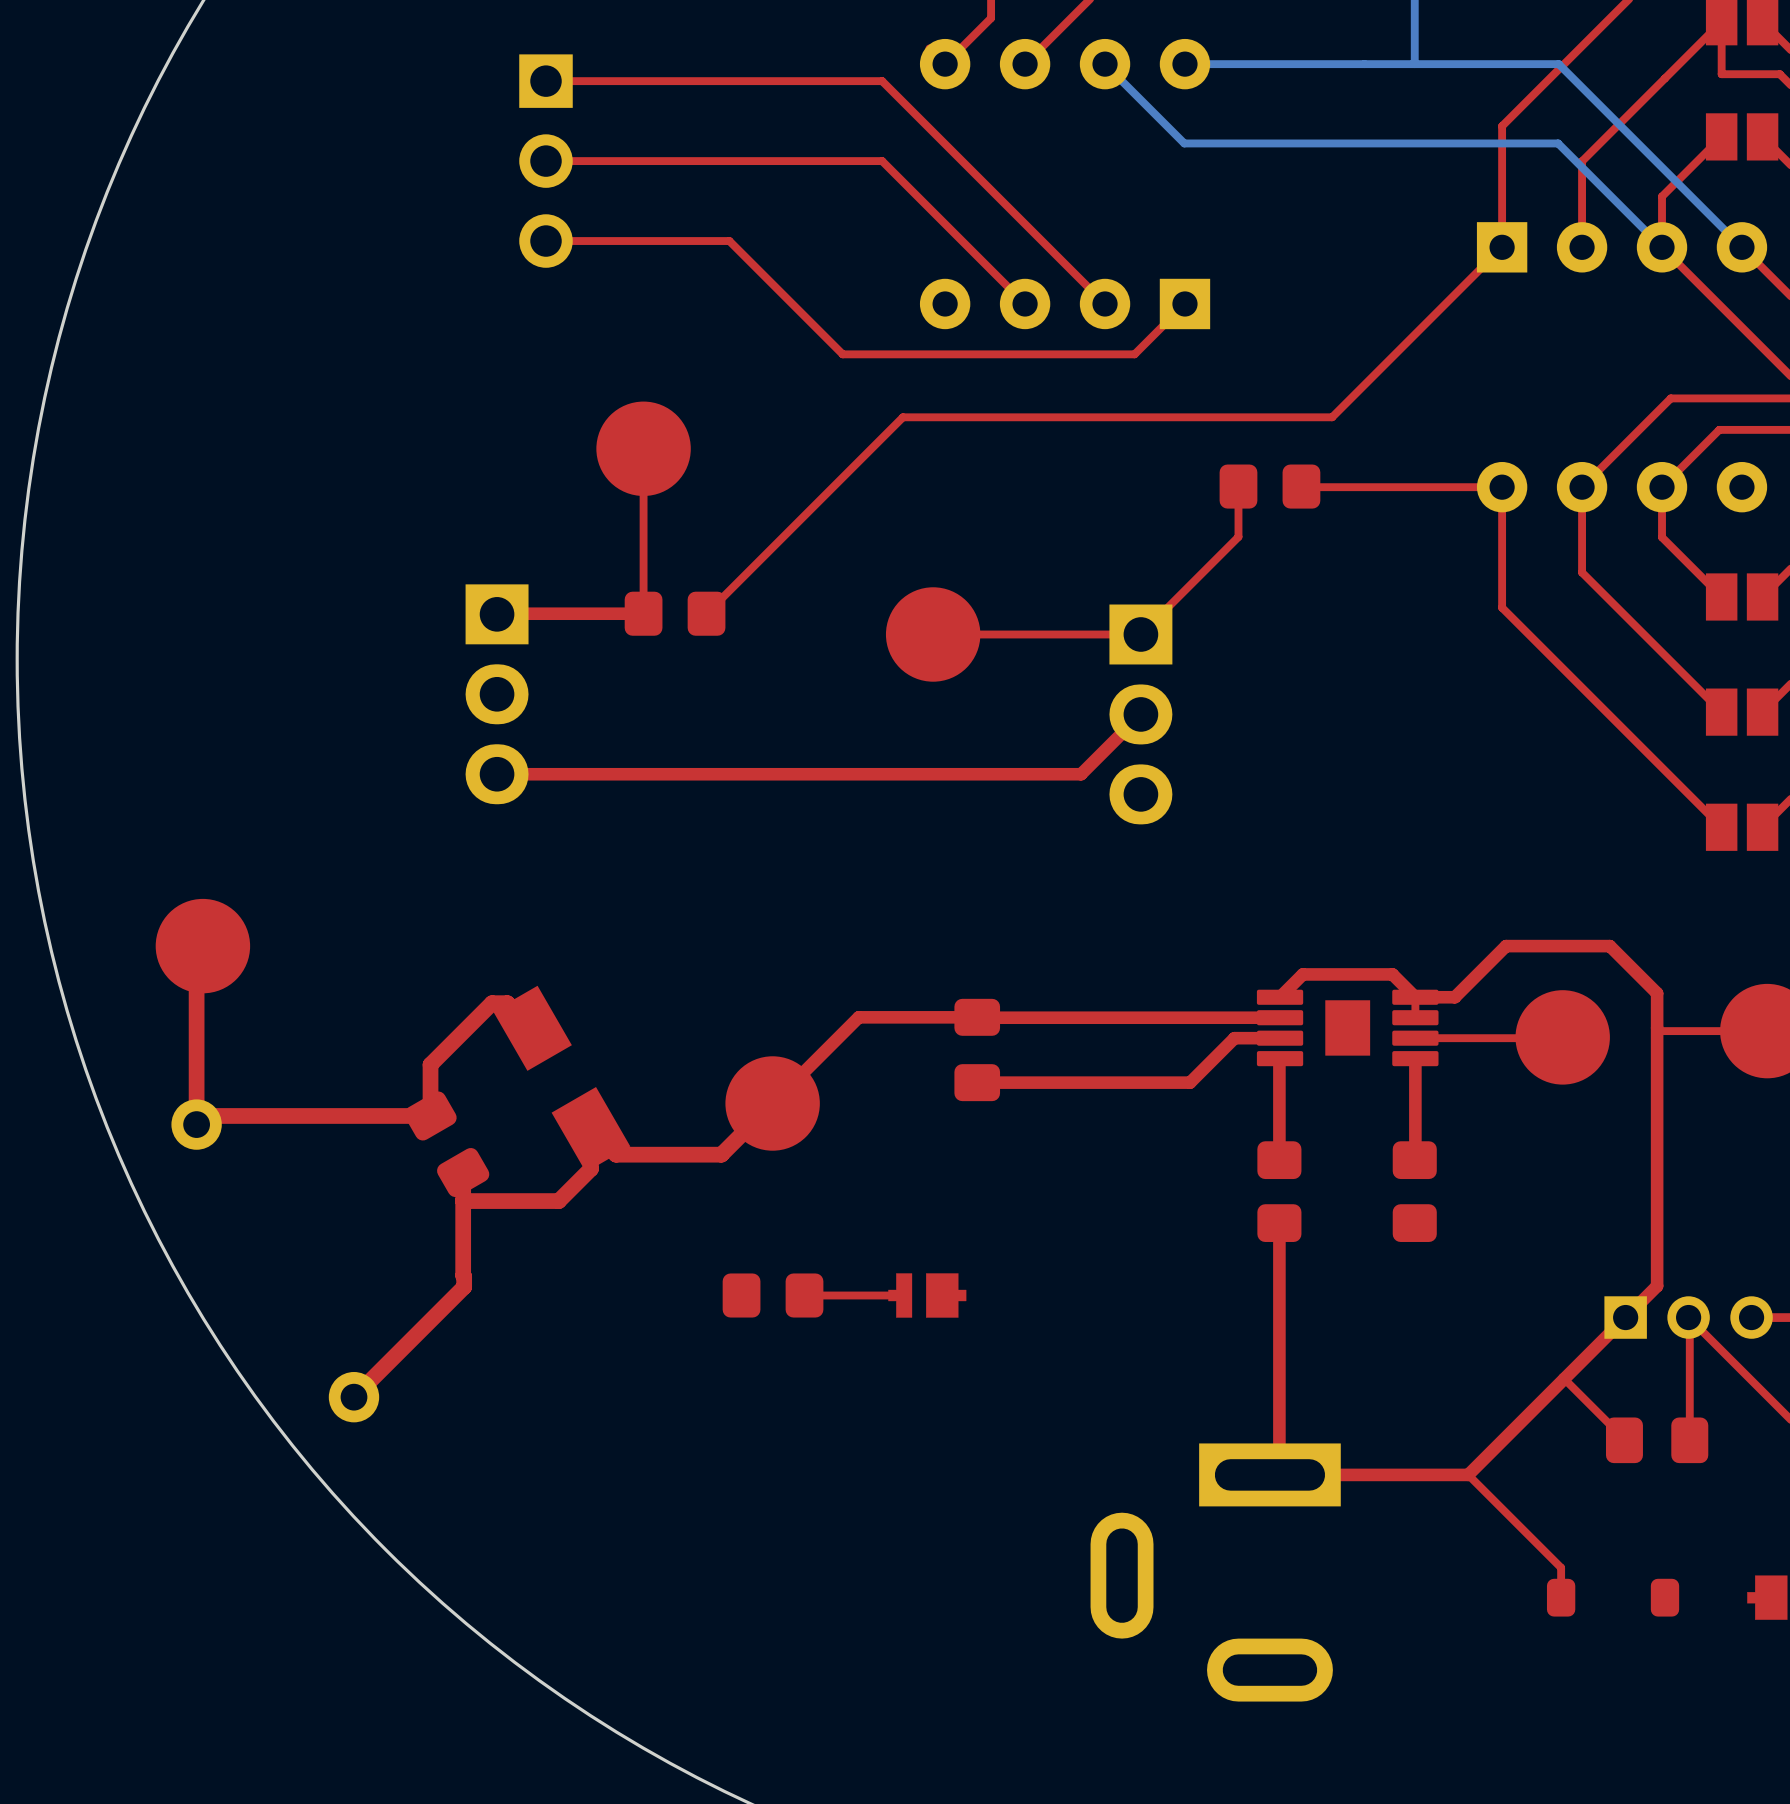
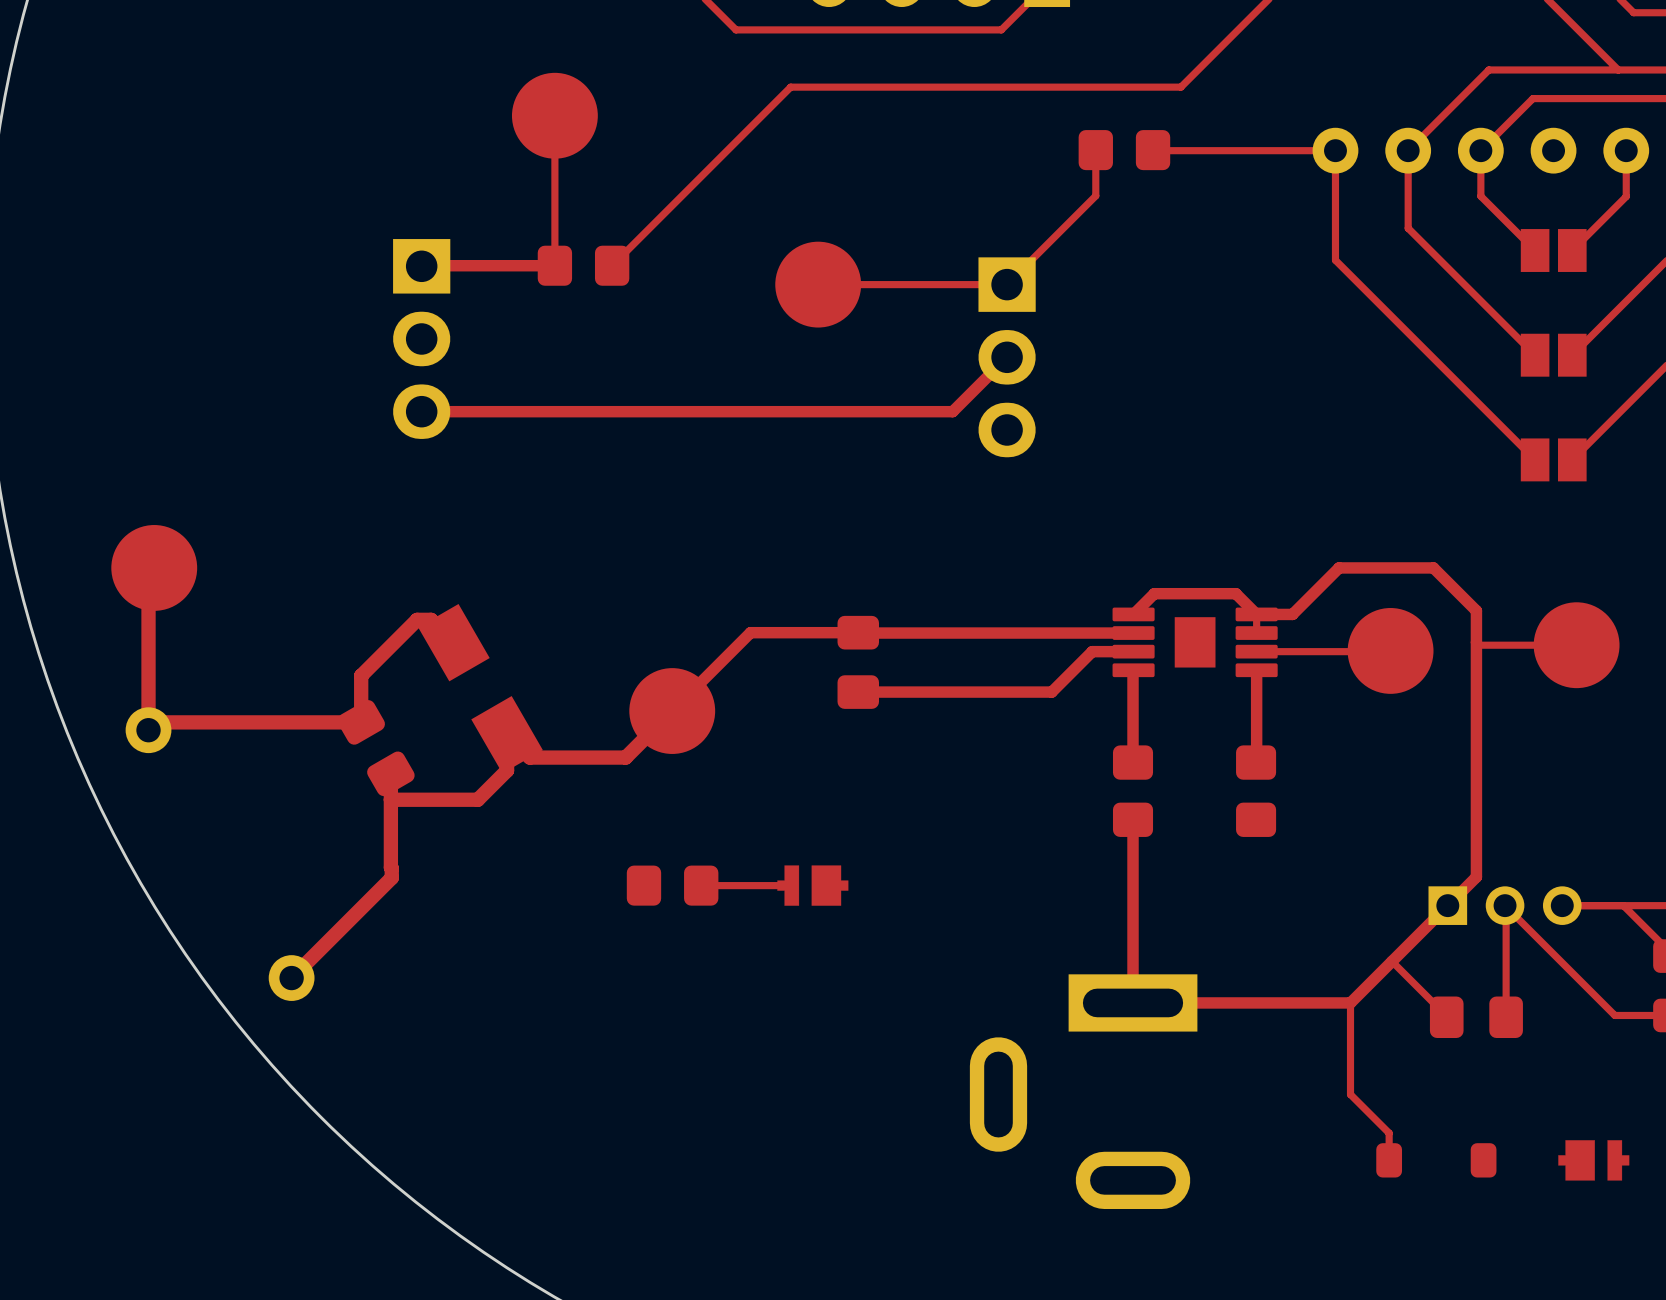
top track: (1279, 1424) (1279, 1465) (1269, 1474) (1468, 1474) -> (1133, 1002) (1350, 1002) (1350, 1094)
top track: (1518, 1424) (1468, 1474) -> none
top track: (1468, 1474) (1518, 1525) -> none
part position: (1215, 1572) -> (1083, 1091)

